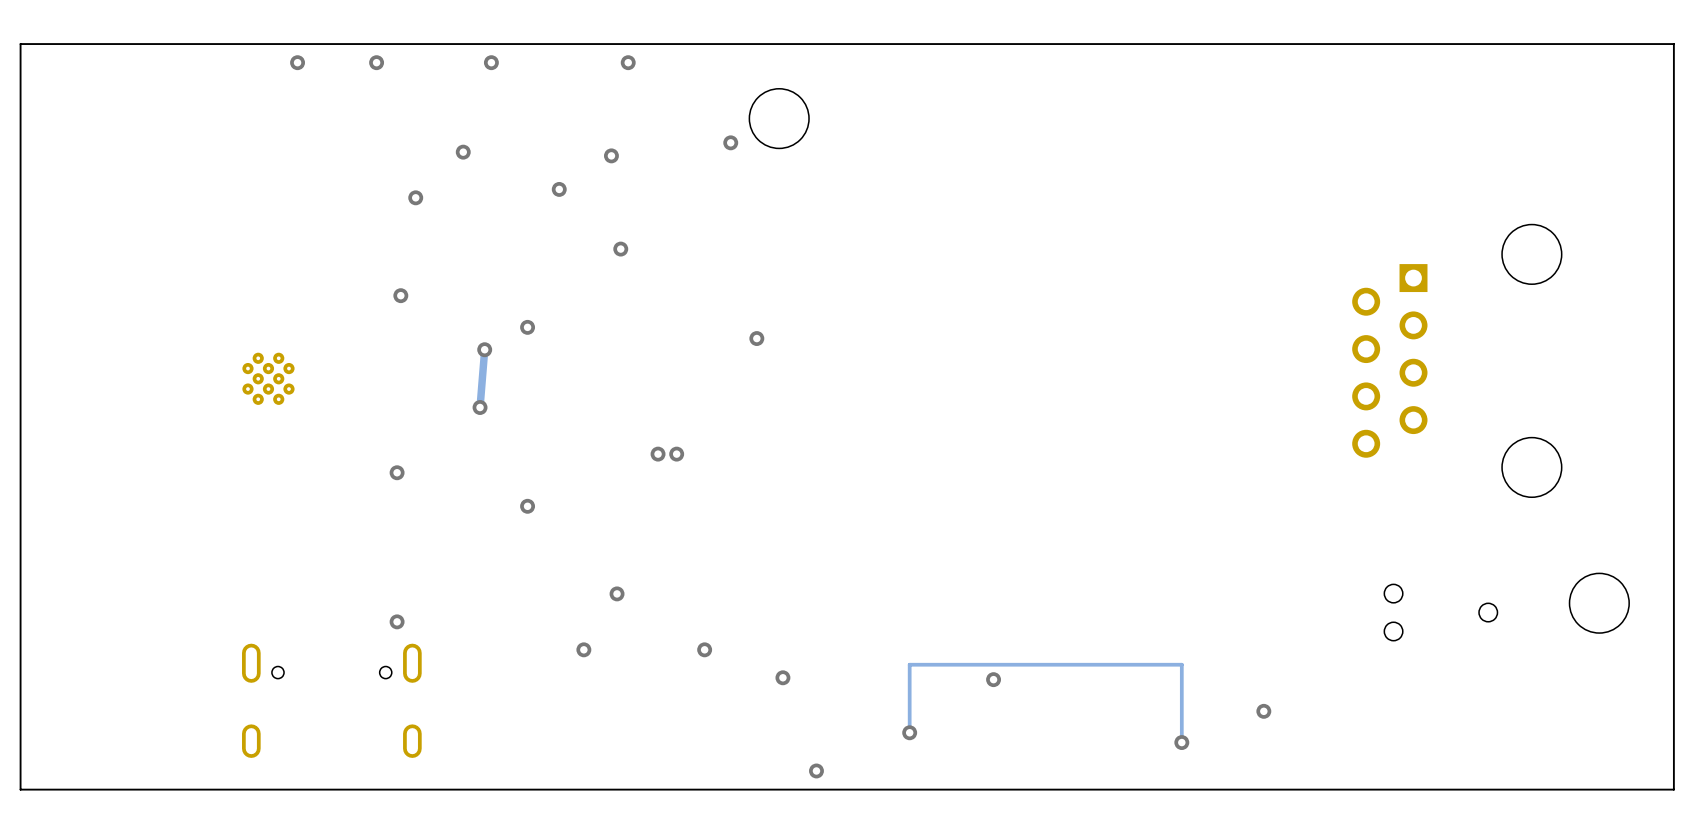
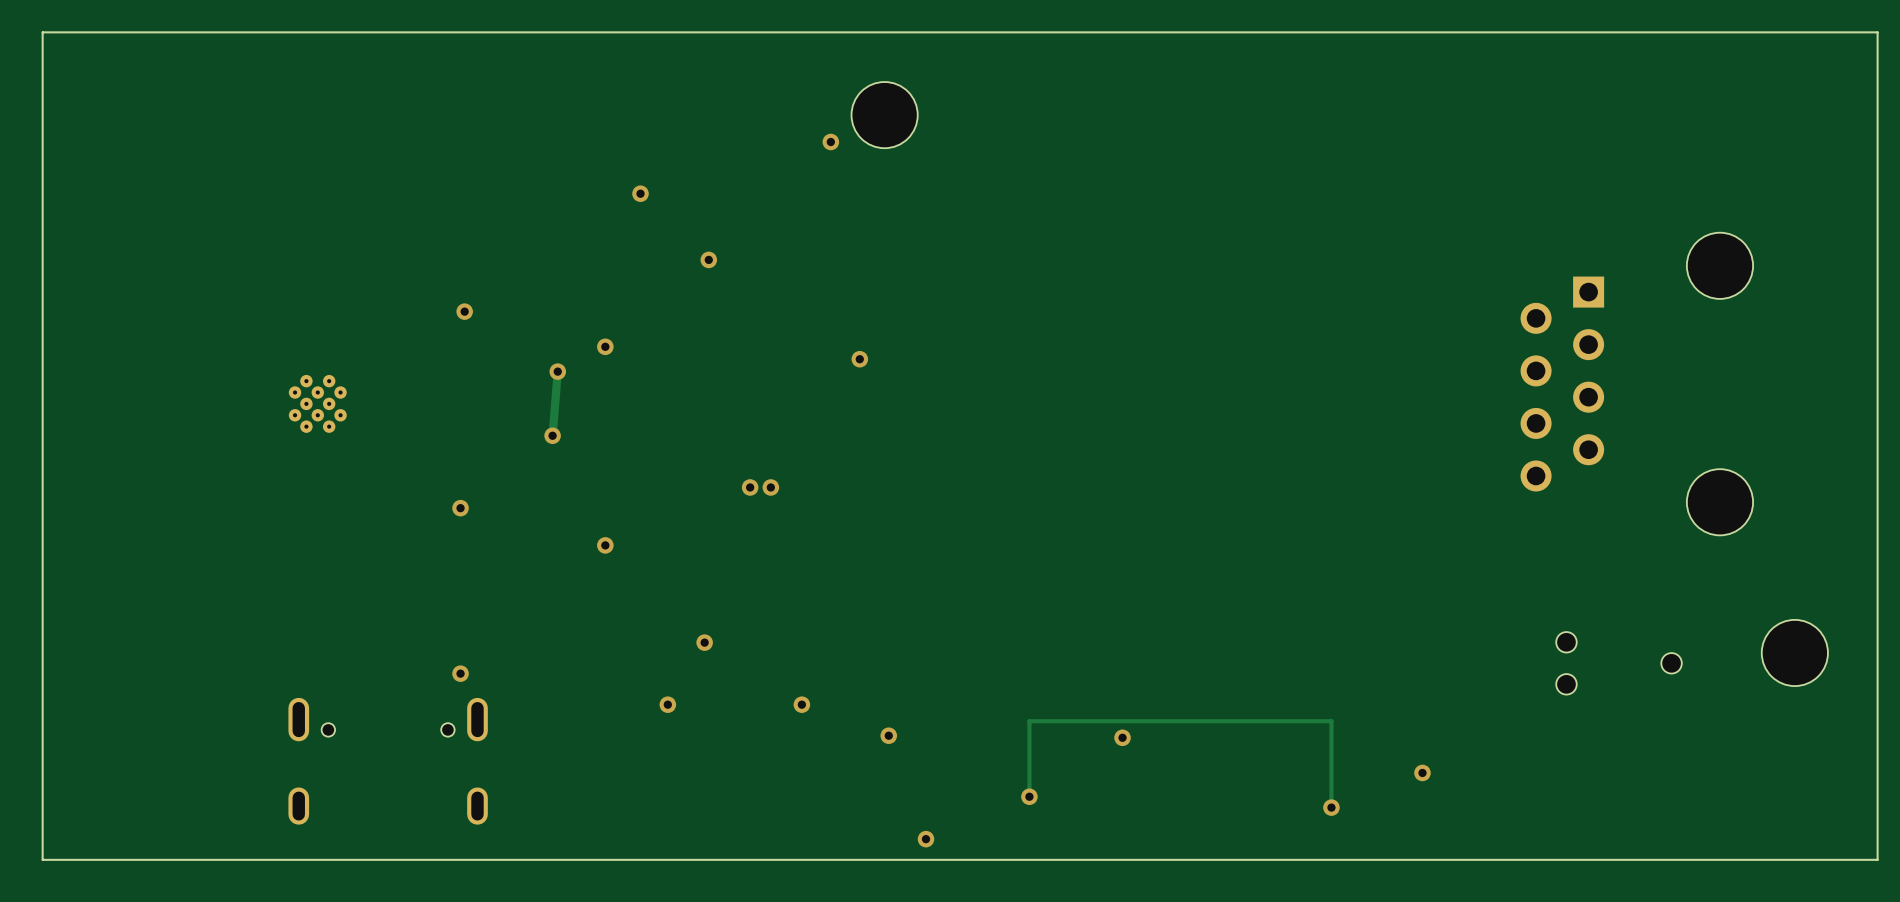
via: (297, 62) -> none
via: (376, 62) -> none
via: (491, 62) -> none
via: (628, 62) -> none
via: (463, 152) -> none
via: (611, 155) -> none
via: (415, 197) -> none

